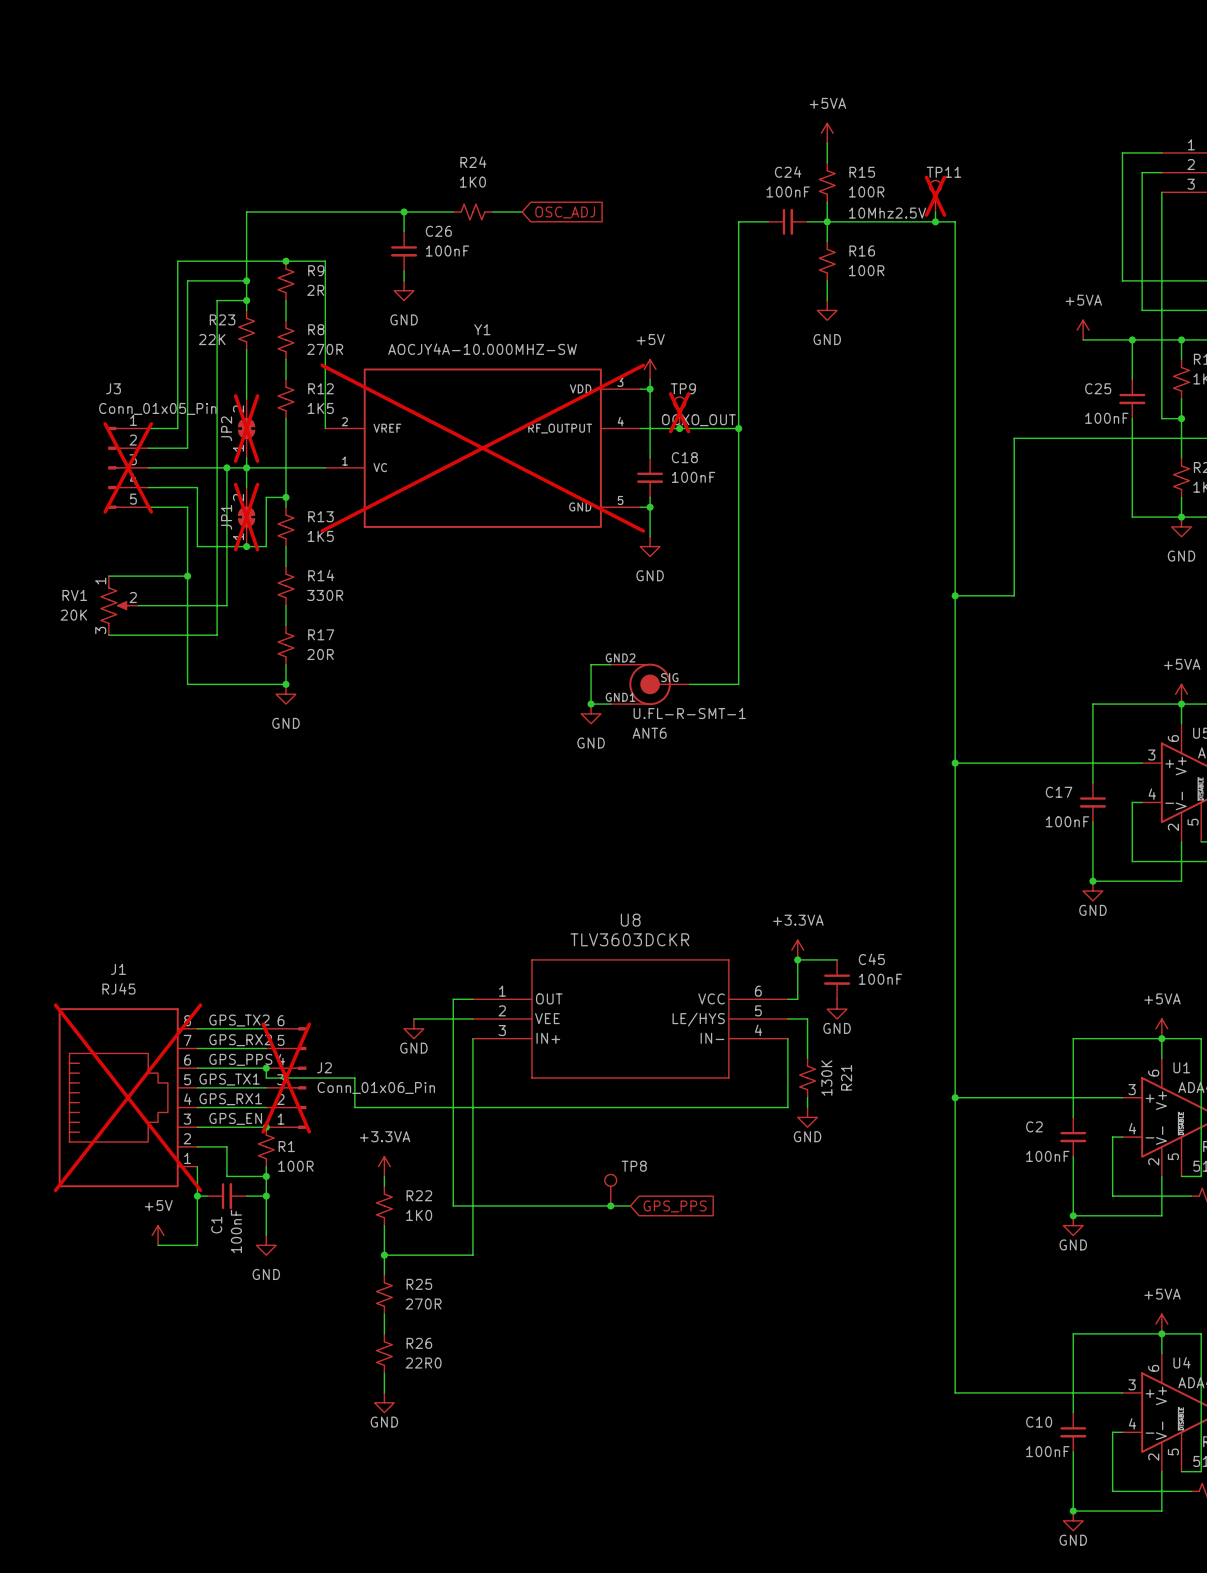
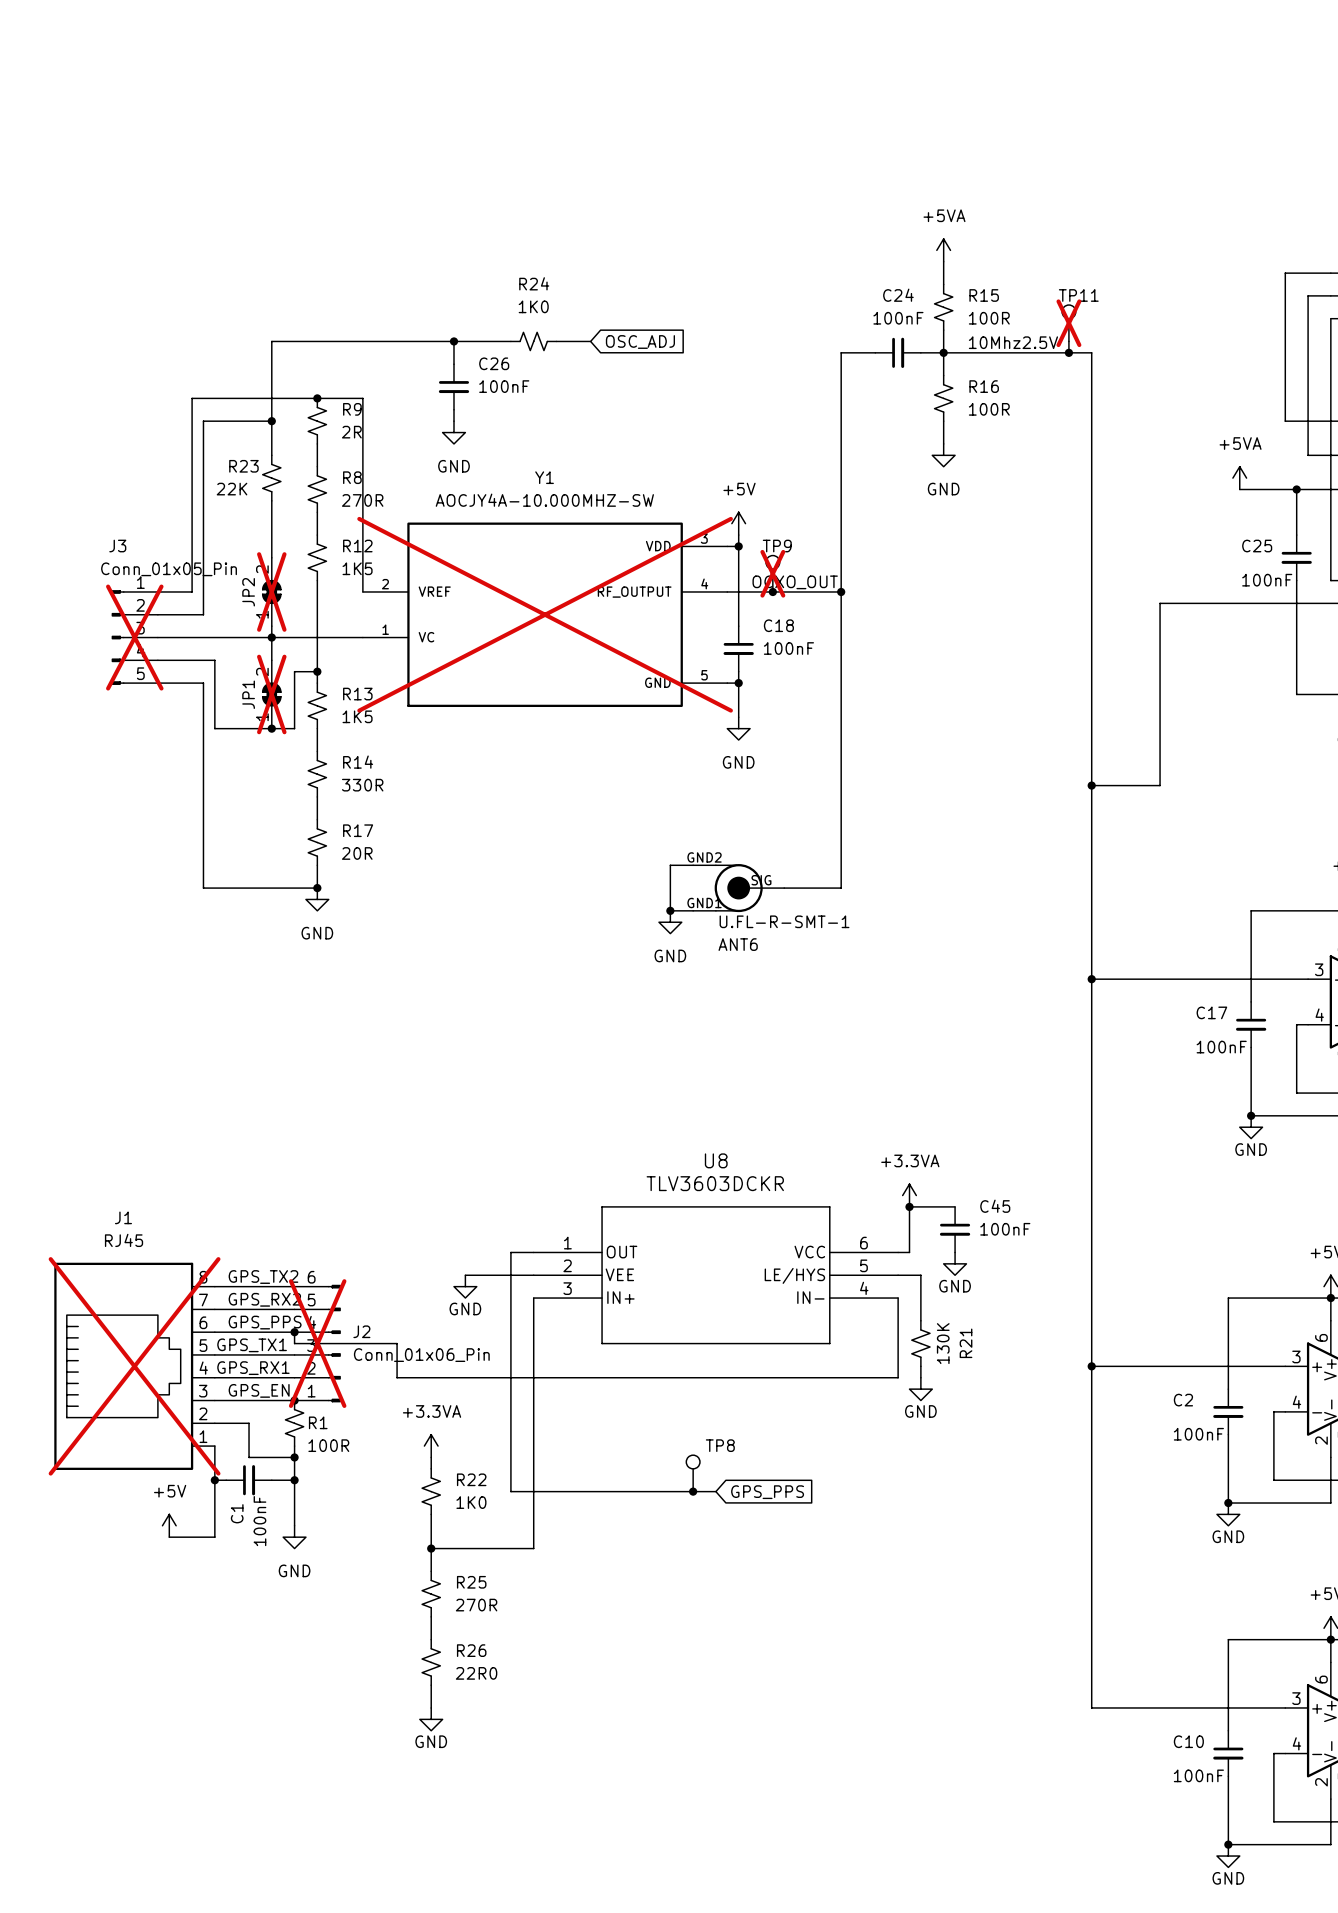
wire: (246, 300) (217, 300) (217, 635) (108, 635) -> none
junction: (246, 300) -> none
wire: (226, 467) (226, 605) (138, 605) -> none
junction: (226, 467) -> none
wire: (108, 576) (187, 576) -> none
junction: (187, 576) -> none
RV1: 20K (119, 605) -> none

